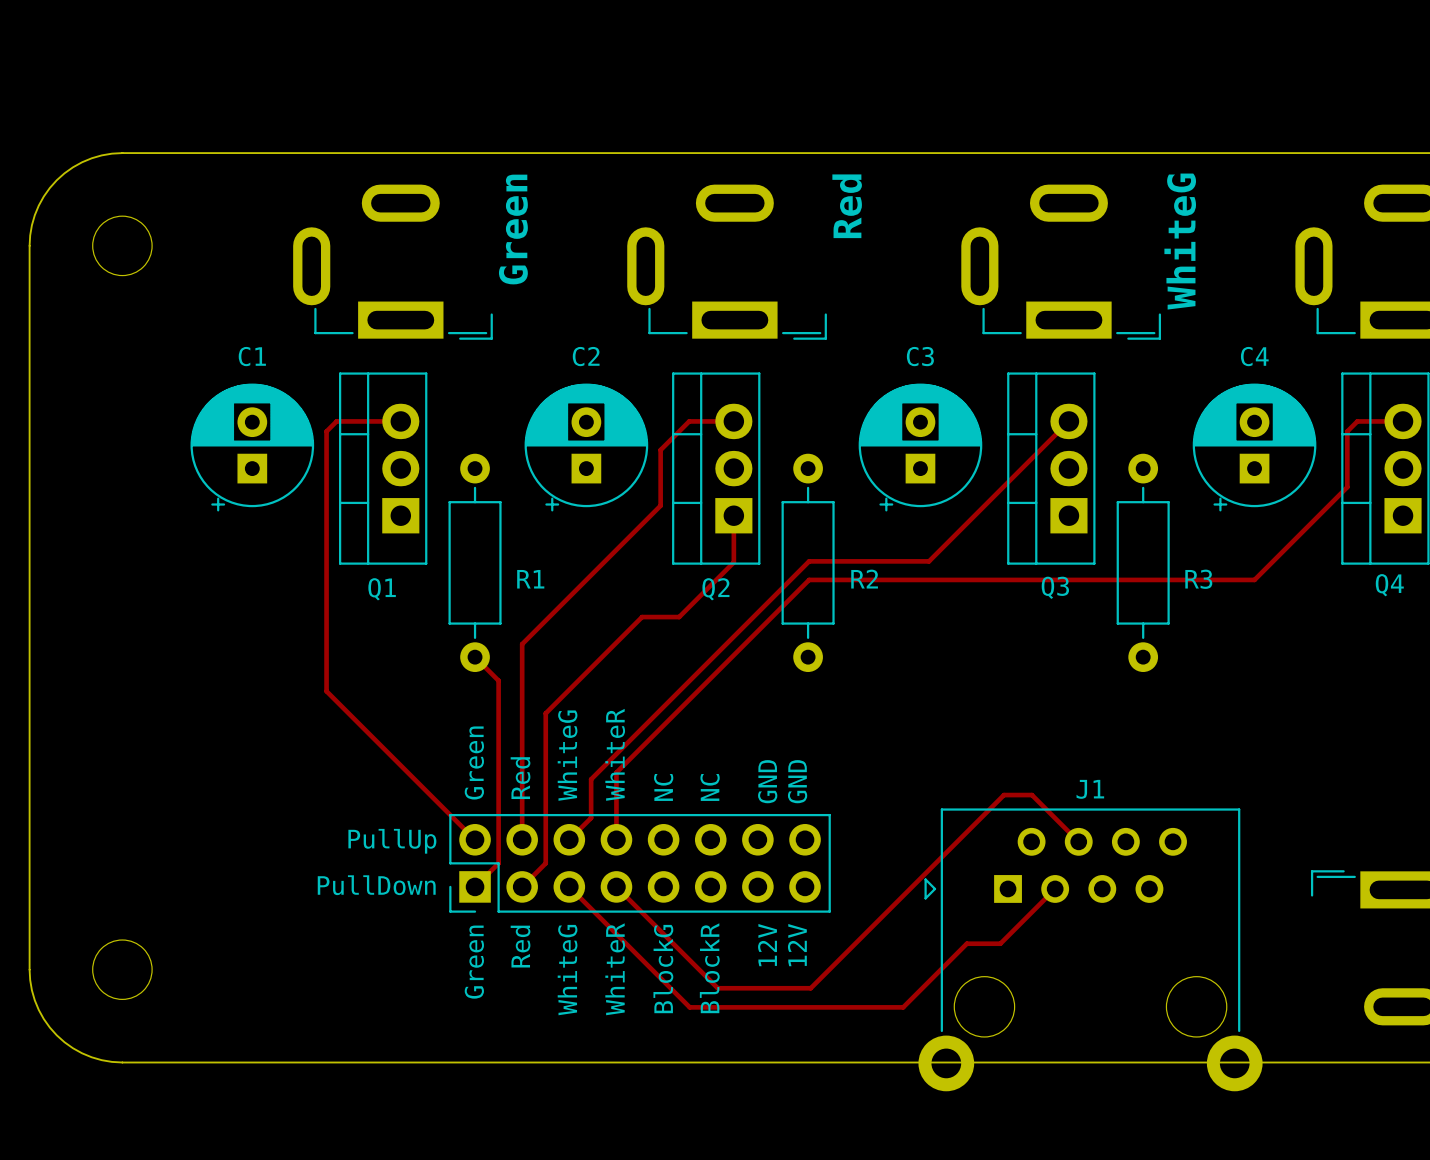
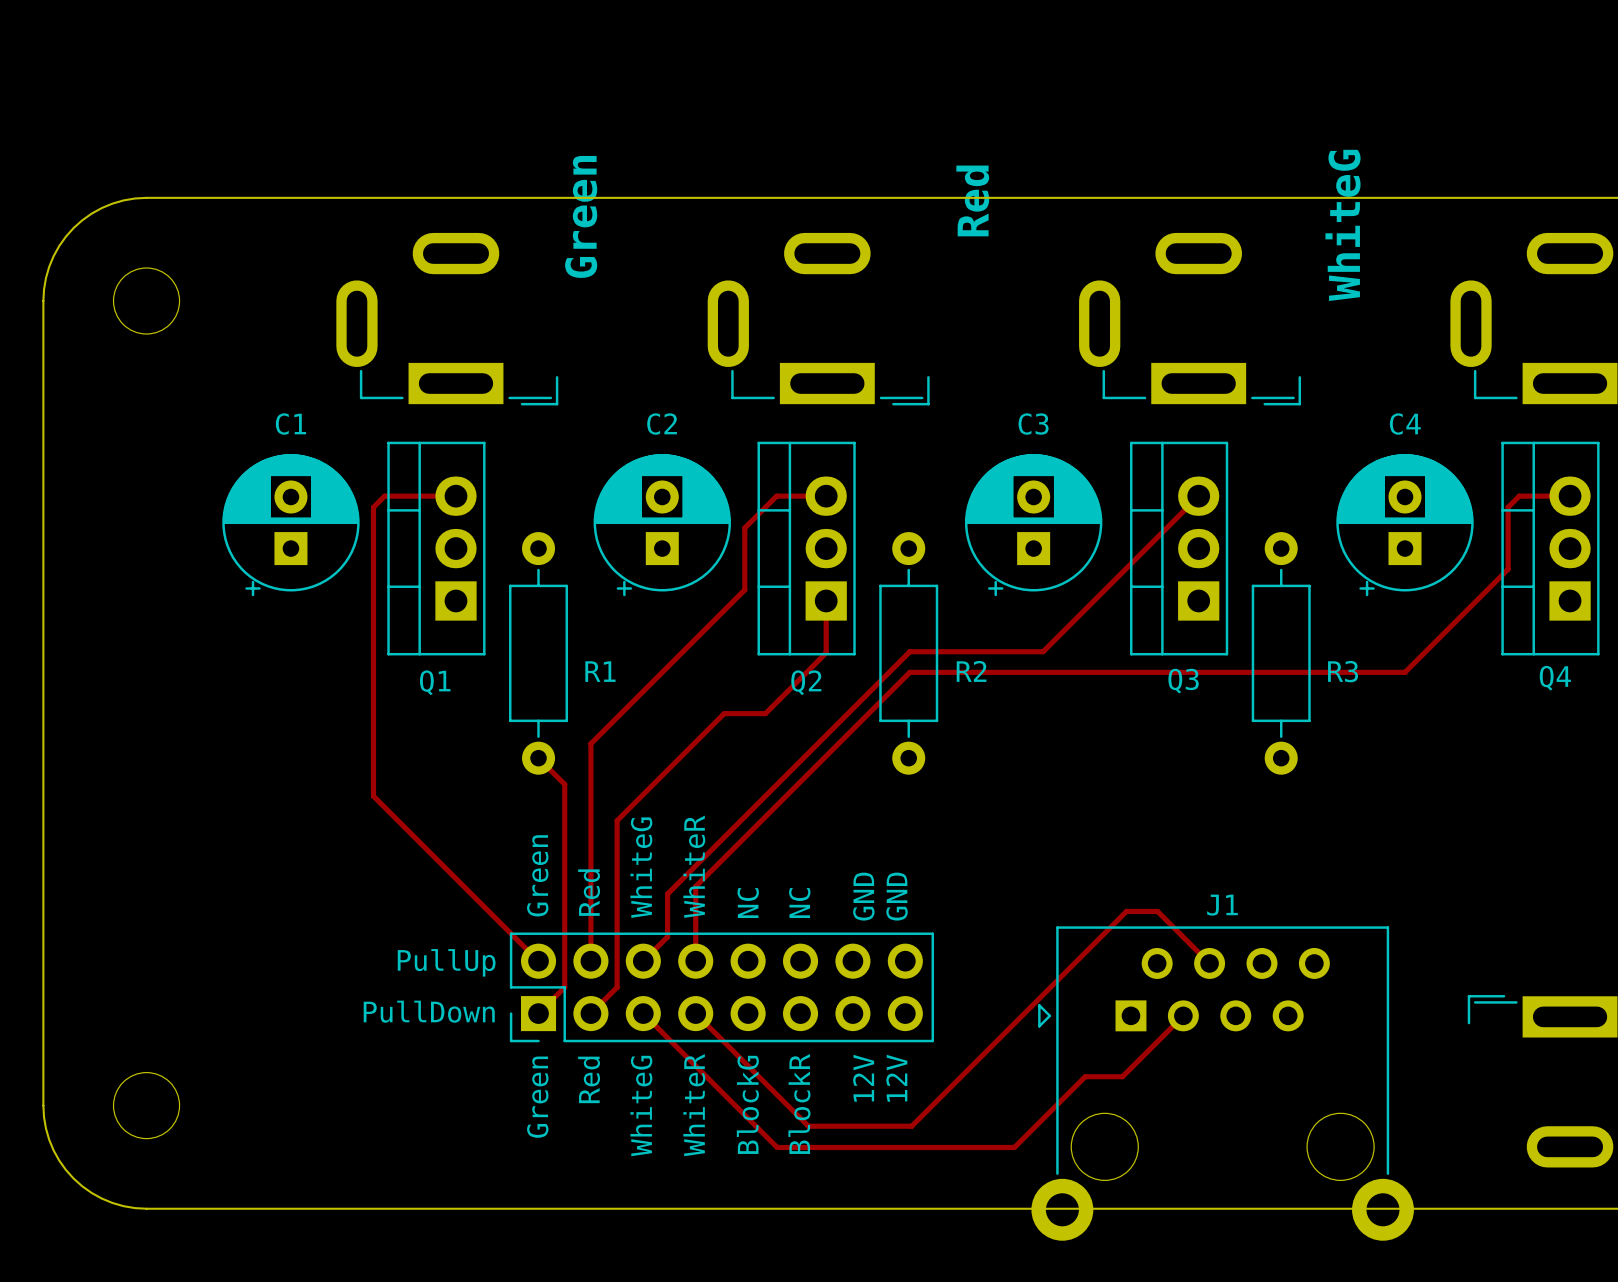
text position: Red (847, 206) -> Red (972, 200)
text position: Green (513, 229) -> Green (581, 216)
text position: WhiteG (1180, 241) -> WhiteG (1343, 225)

